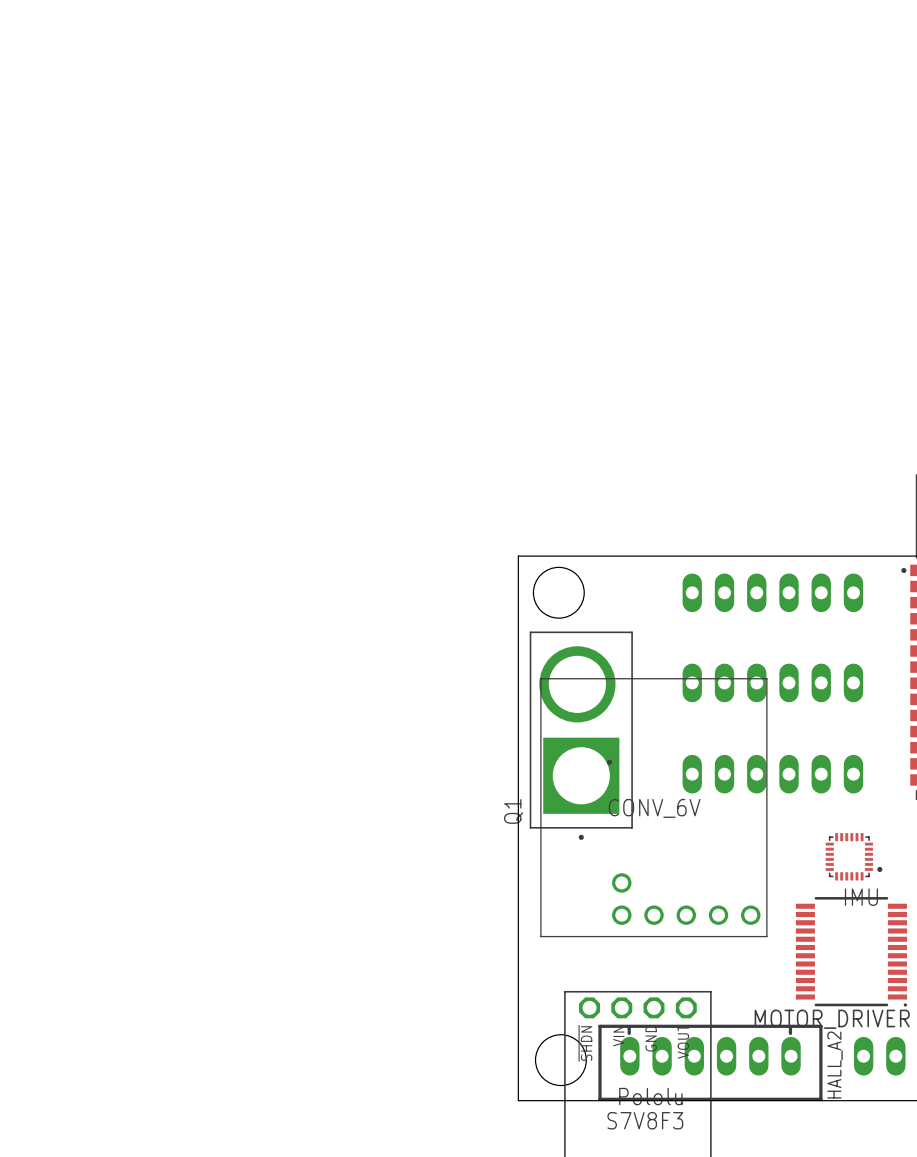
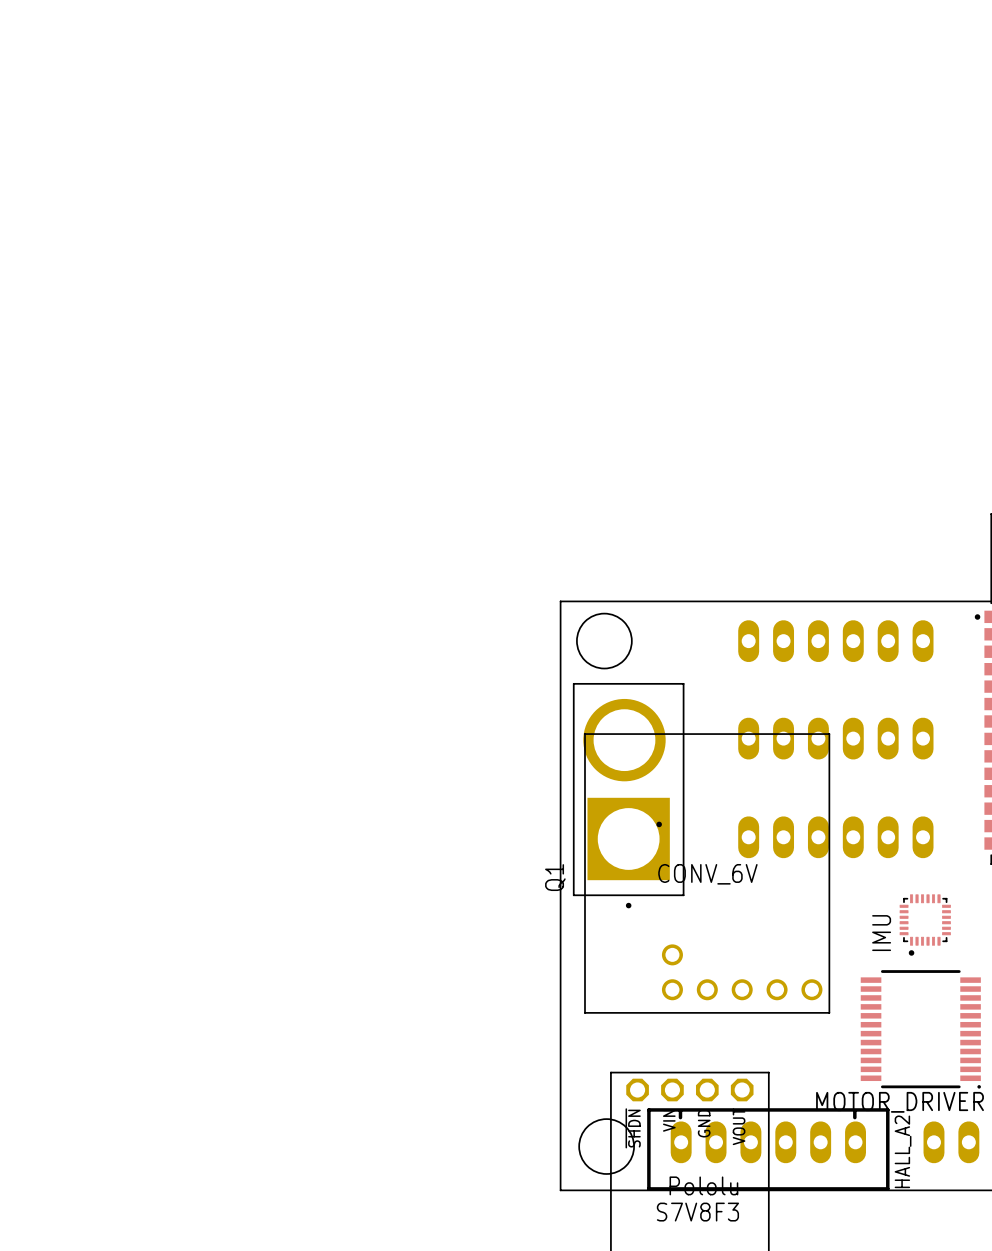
IMU rotation: 0° (854, 856) -> 90° clockwise (925, 925)

